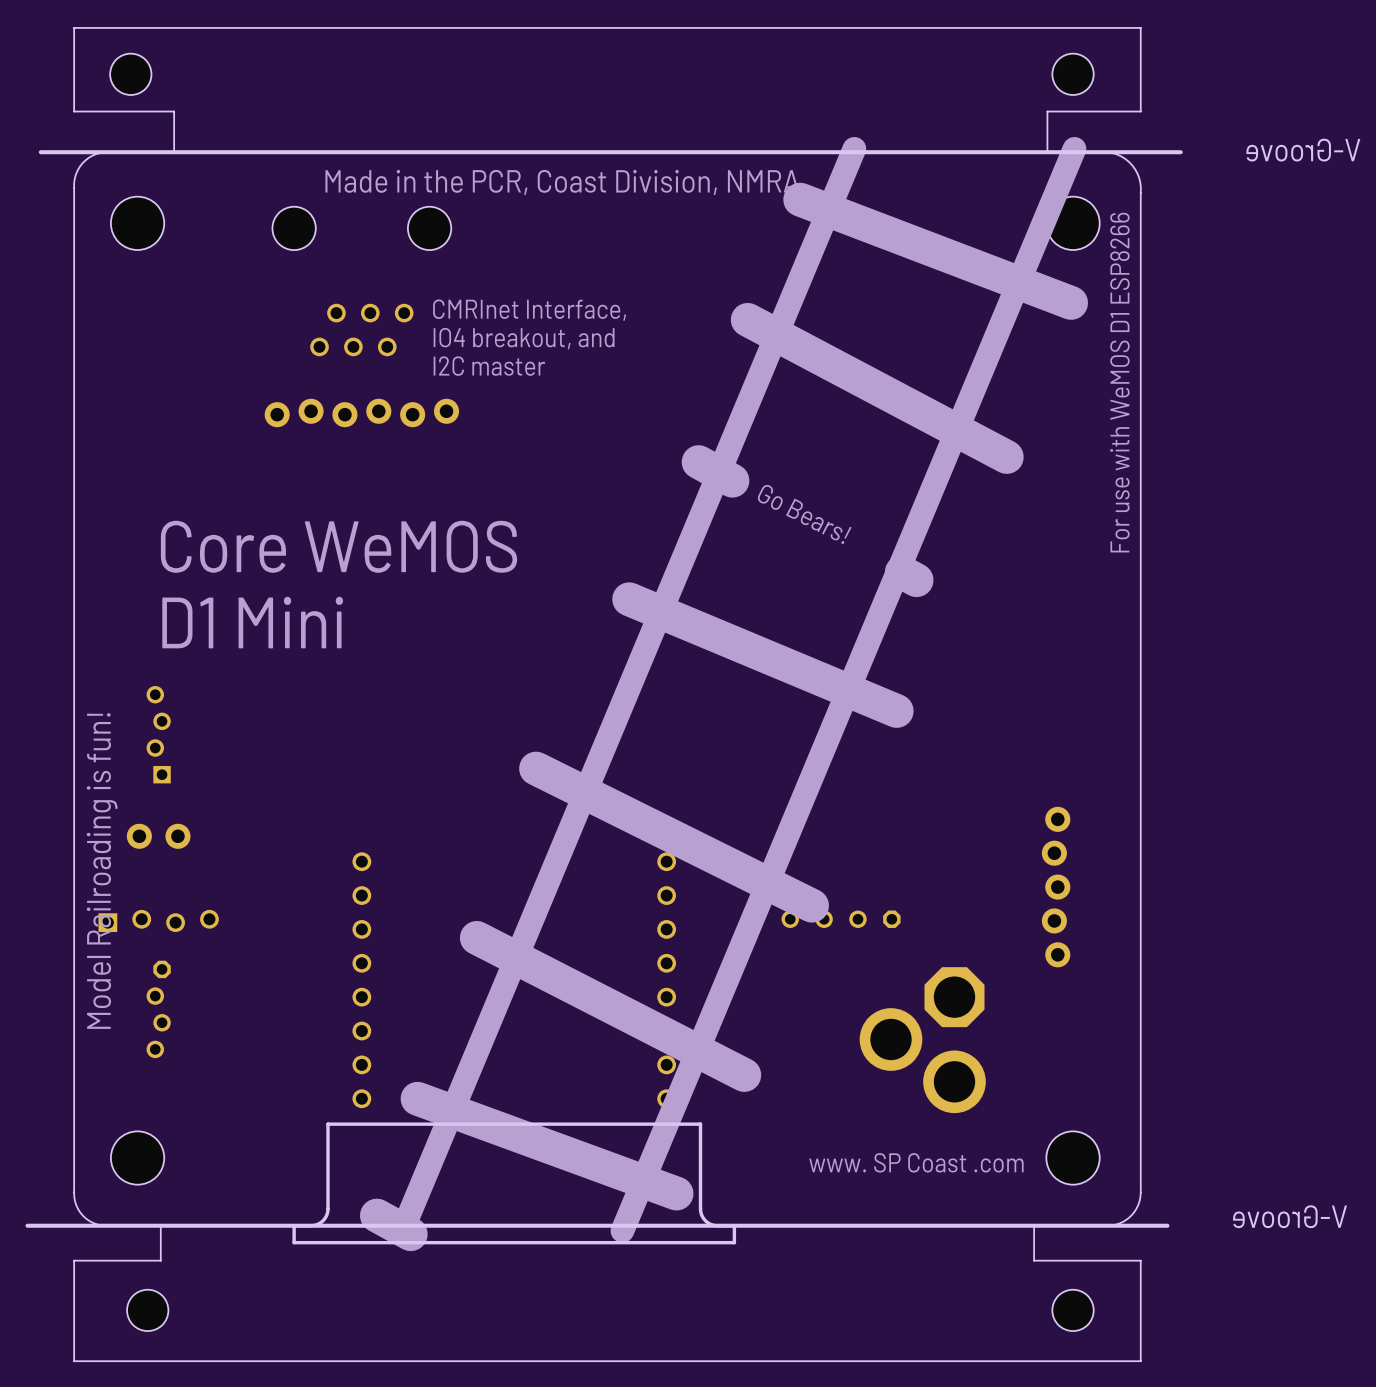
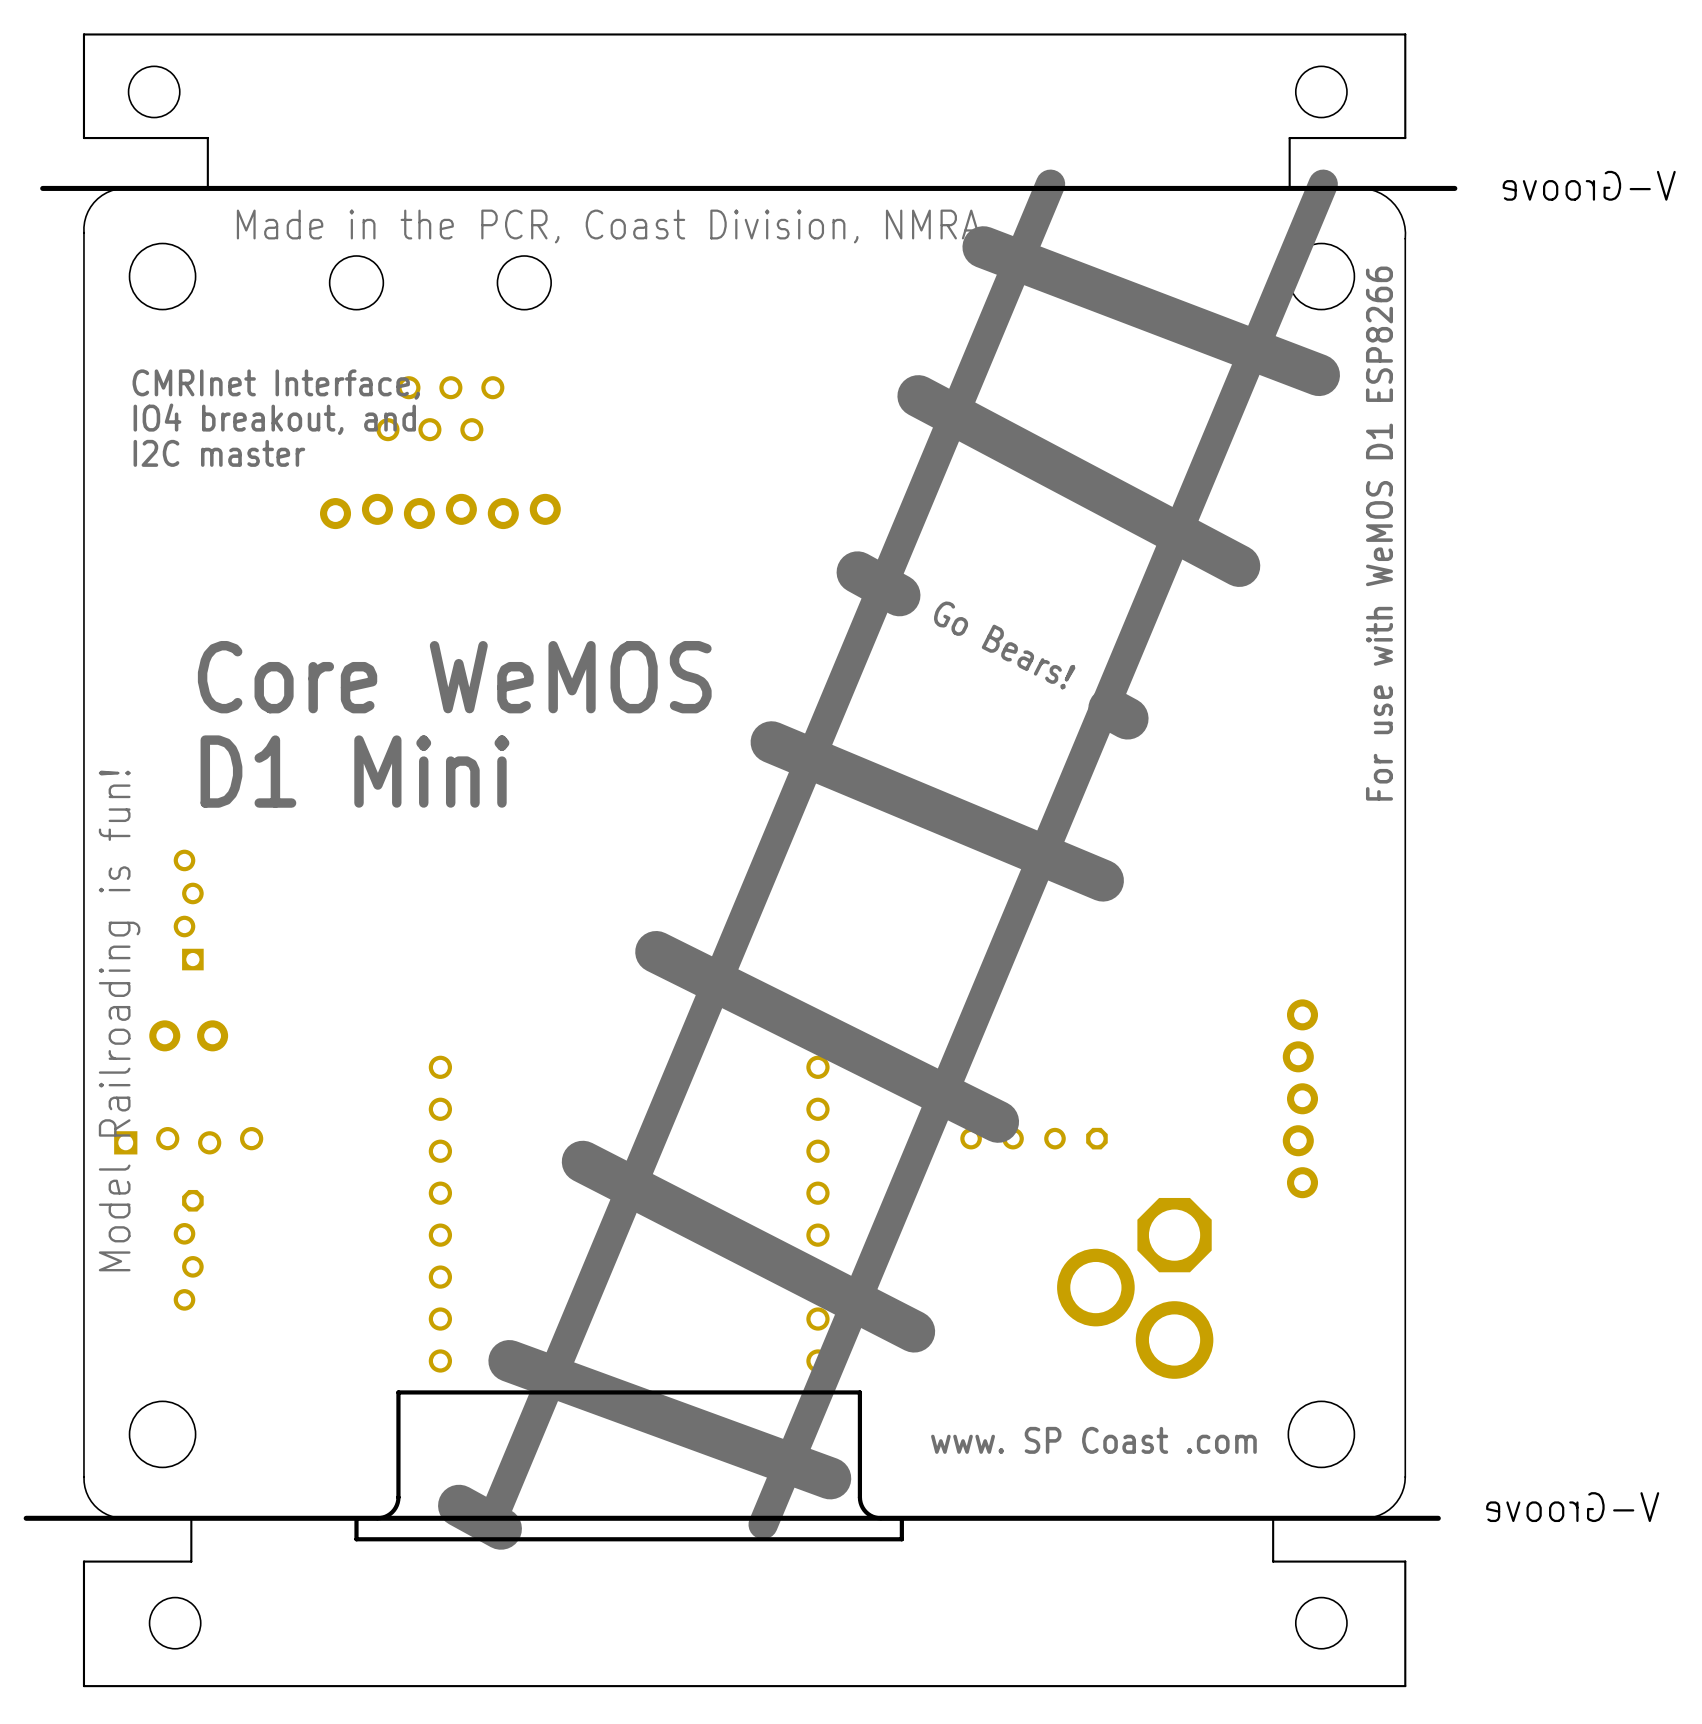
text position: CMRInet Interface, (529, 310) -> CMRInet Interface, (276, 384)
text position: IO4 breakout, and (524, 338) -> IO4 breakout, and (274, 419)
text position: I2C master (489, 366) -> I2C master (219, 453)

